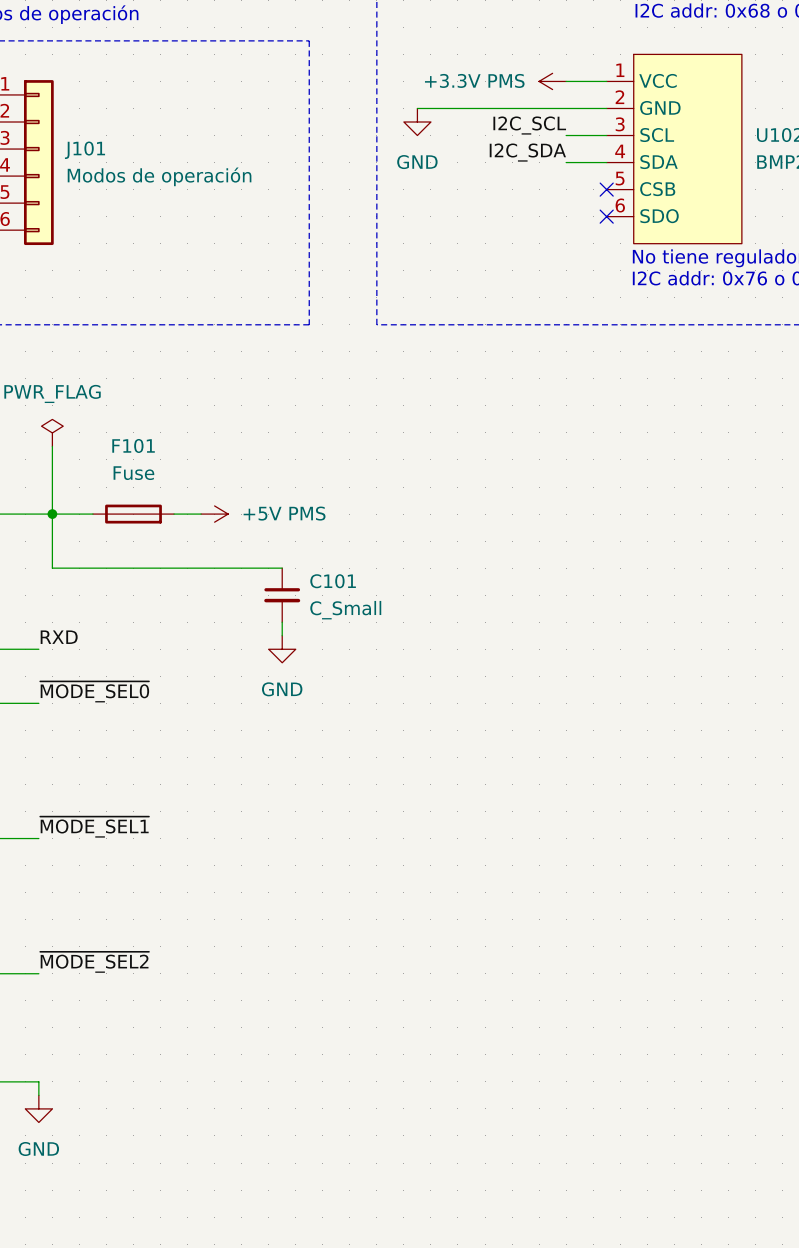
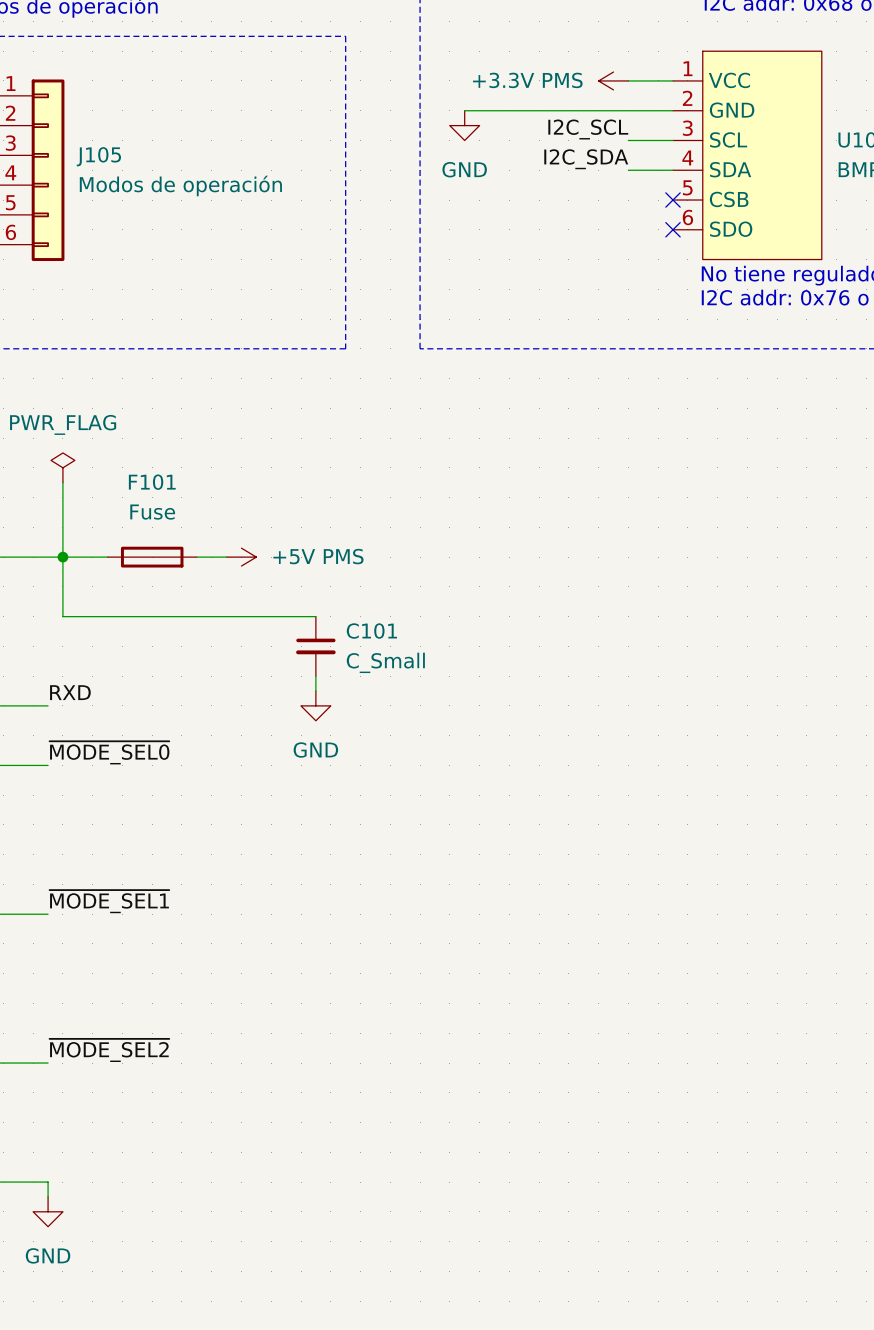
J101 name: J101 (85, 150) -> J105 (98, 156)

